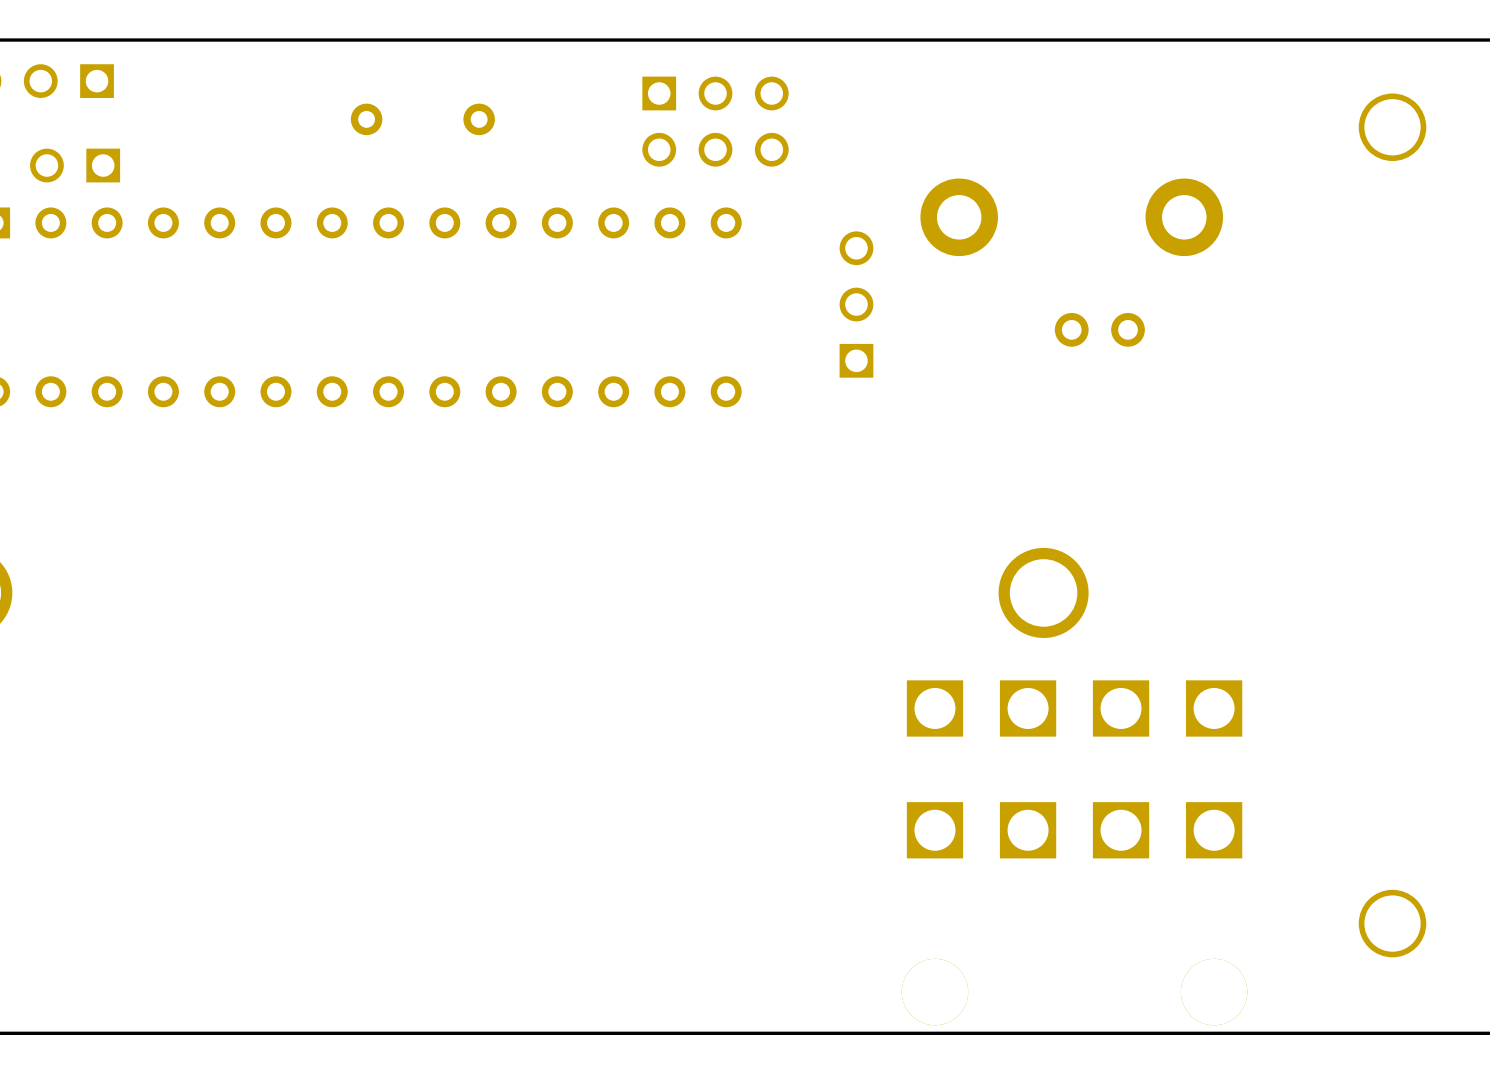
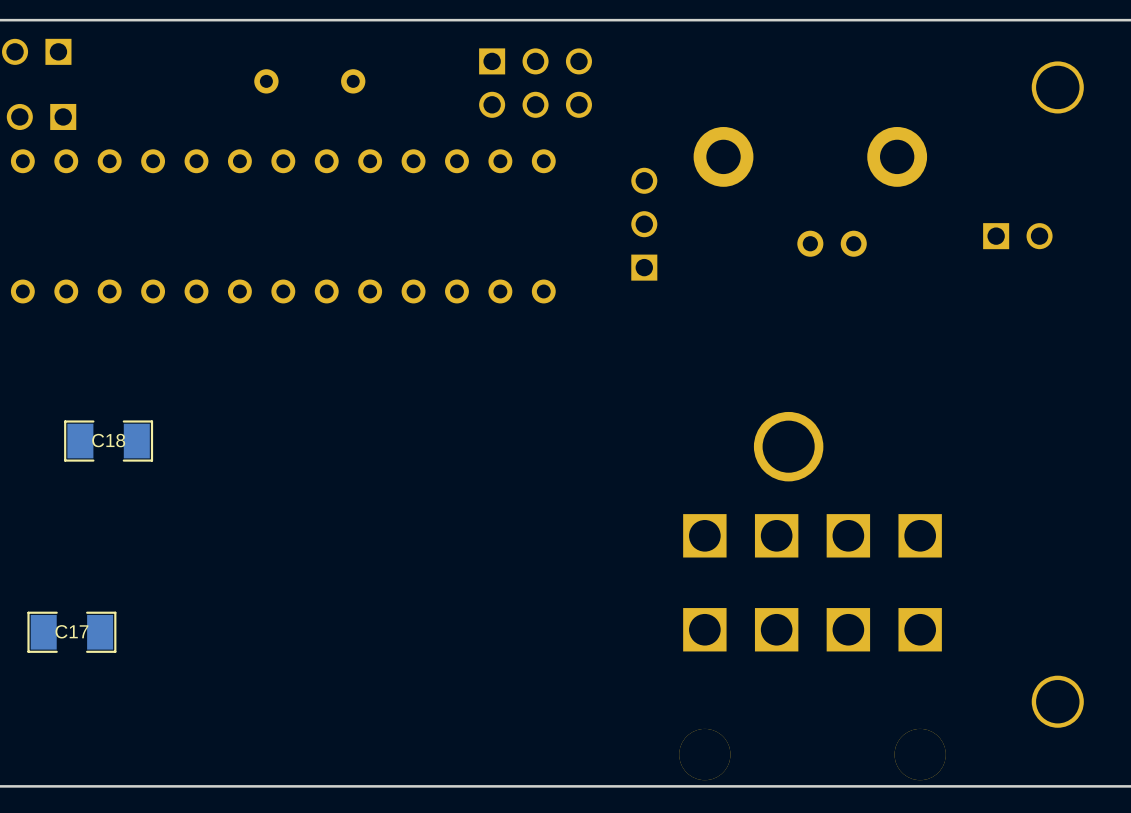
part: none -> (1017, 236)
C18: none -> (108, 441)
C17: none -> (71, 632)

